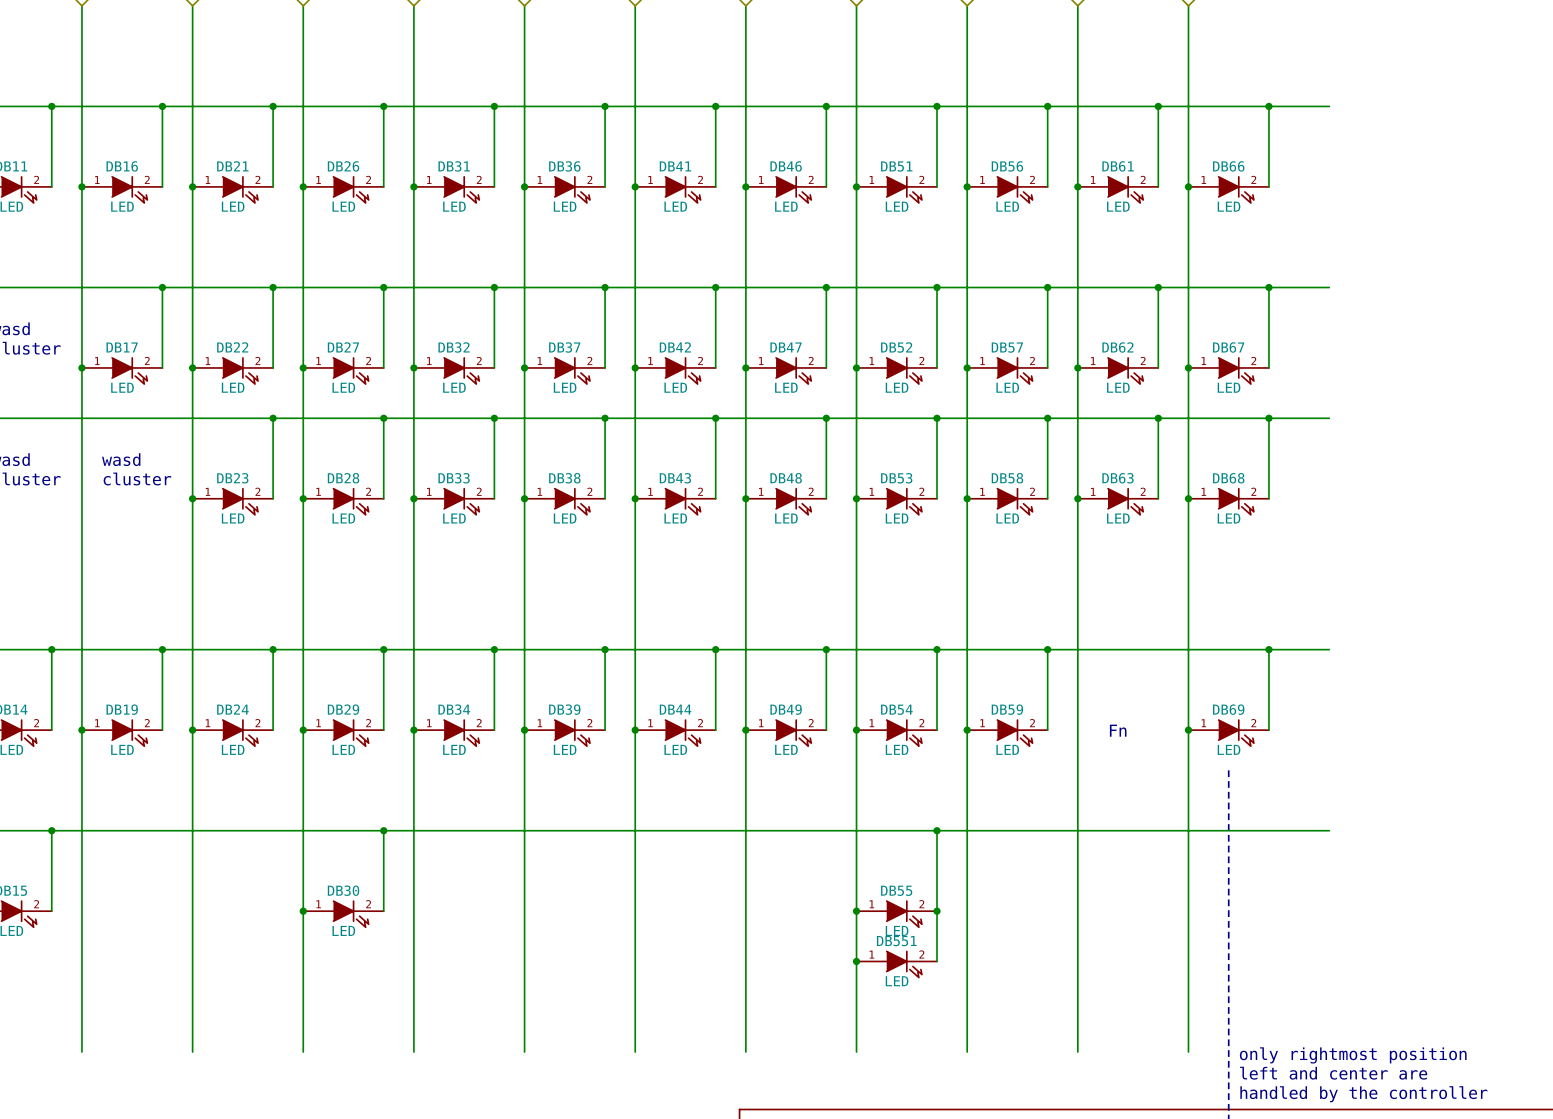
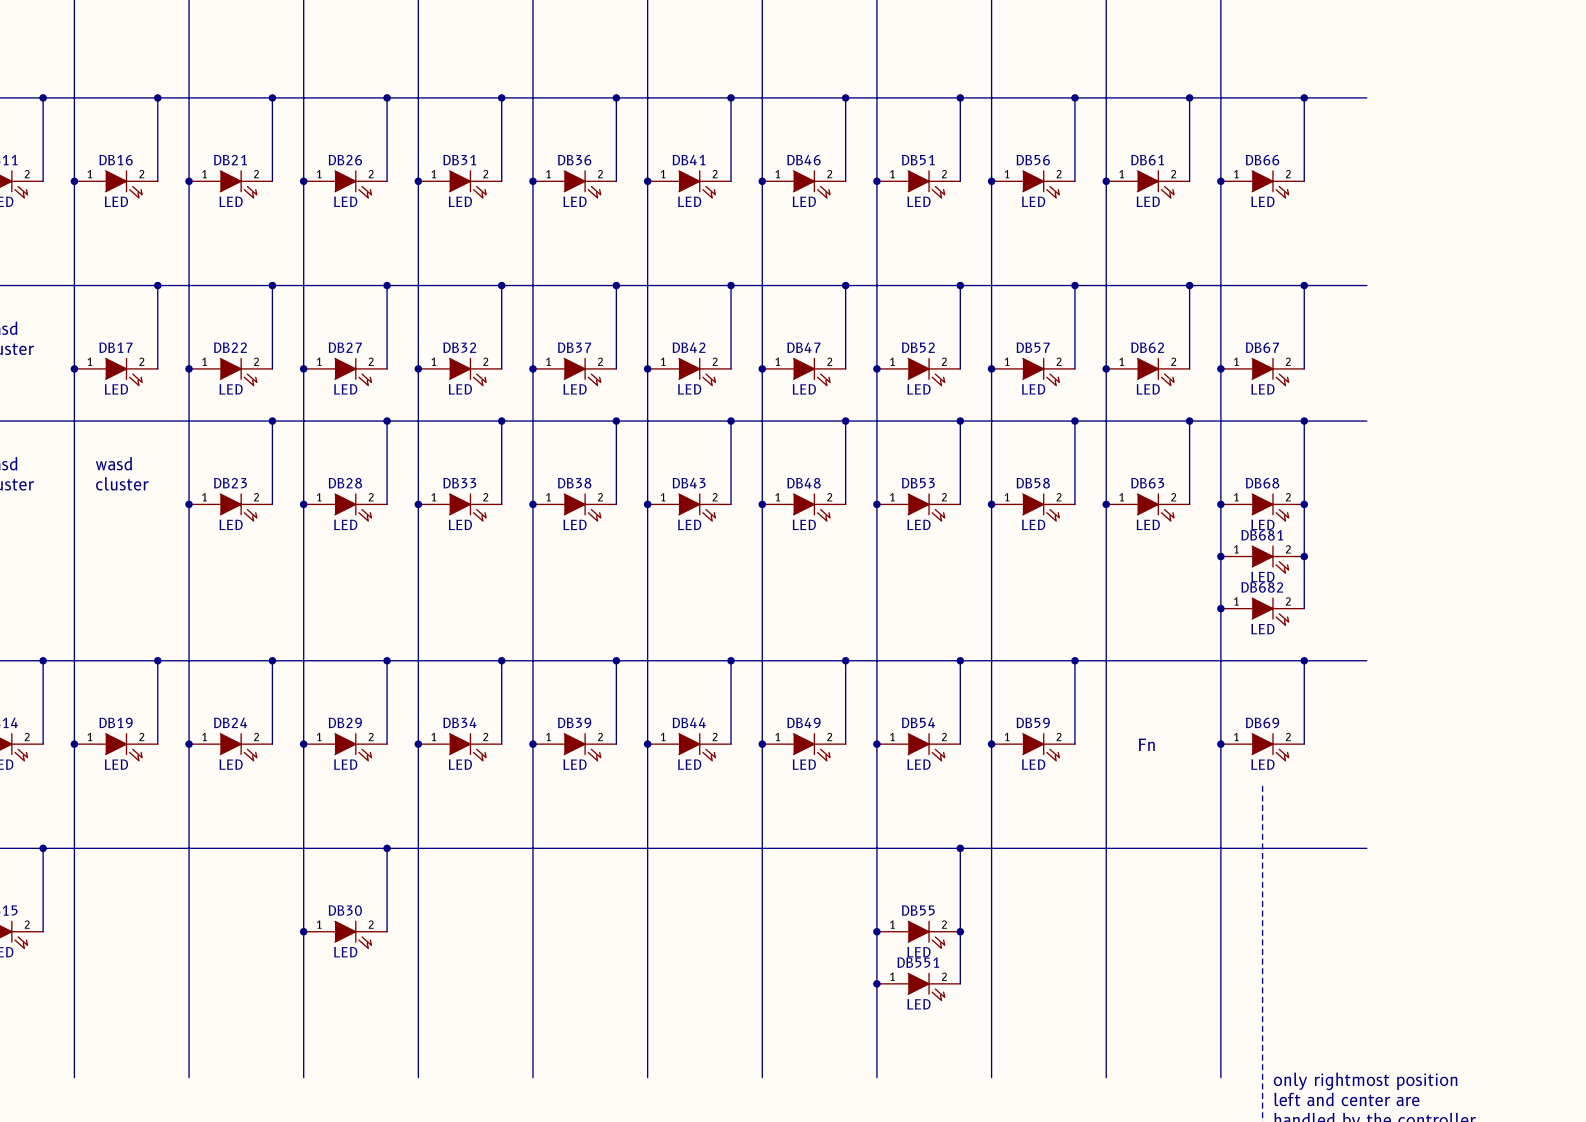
wire: none -> (1304, 504) (1304, 608)
junction: none -> (1304, 504)
junction: none -> (1220, 556)
junction: none -> (1304, 556)
DB681: none -> LED (1262, 559)
junction: none -> (1220, 608)
DB682: none -> LED (1262, 611)

